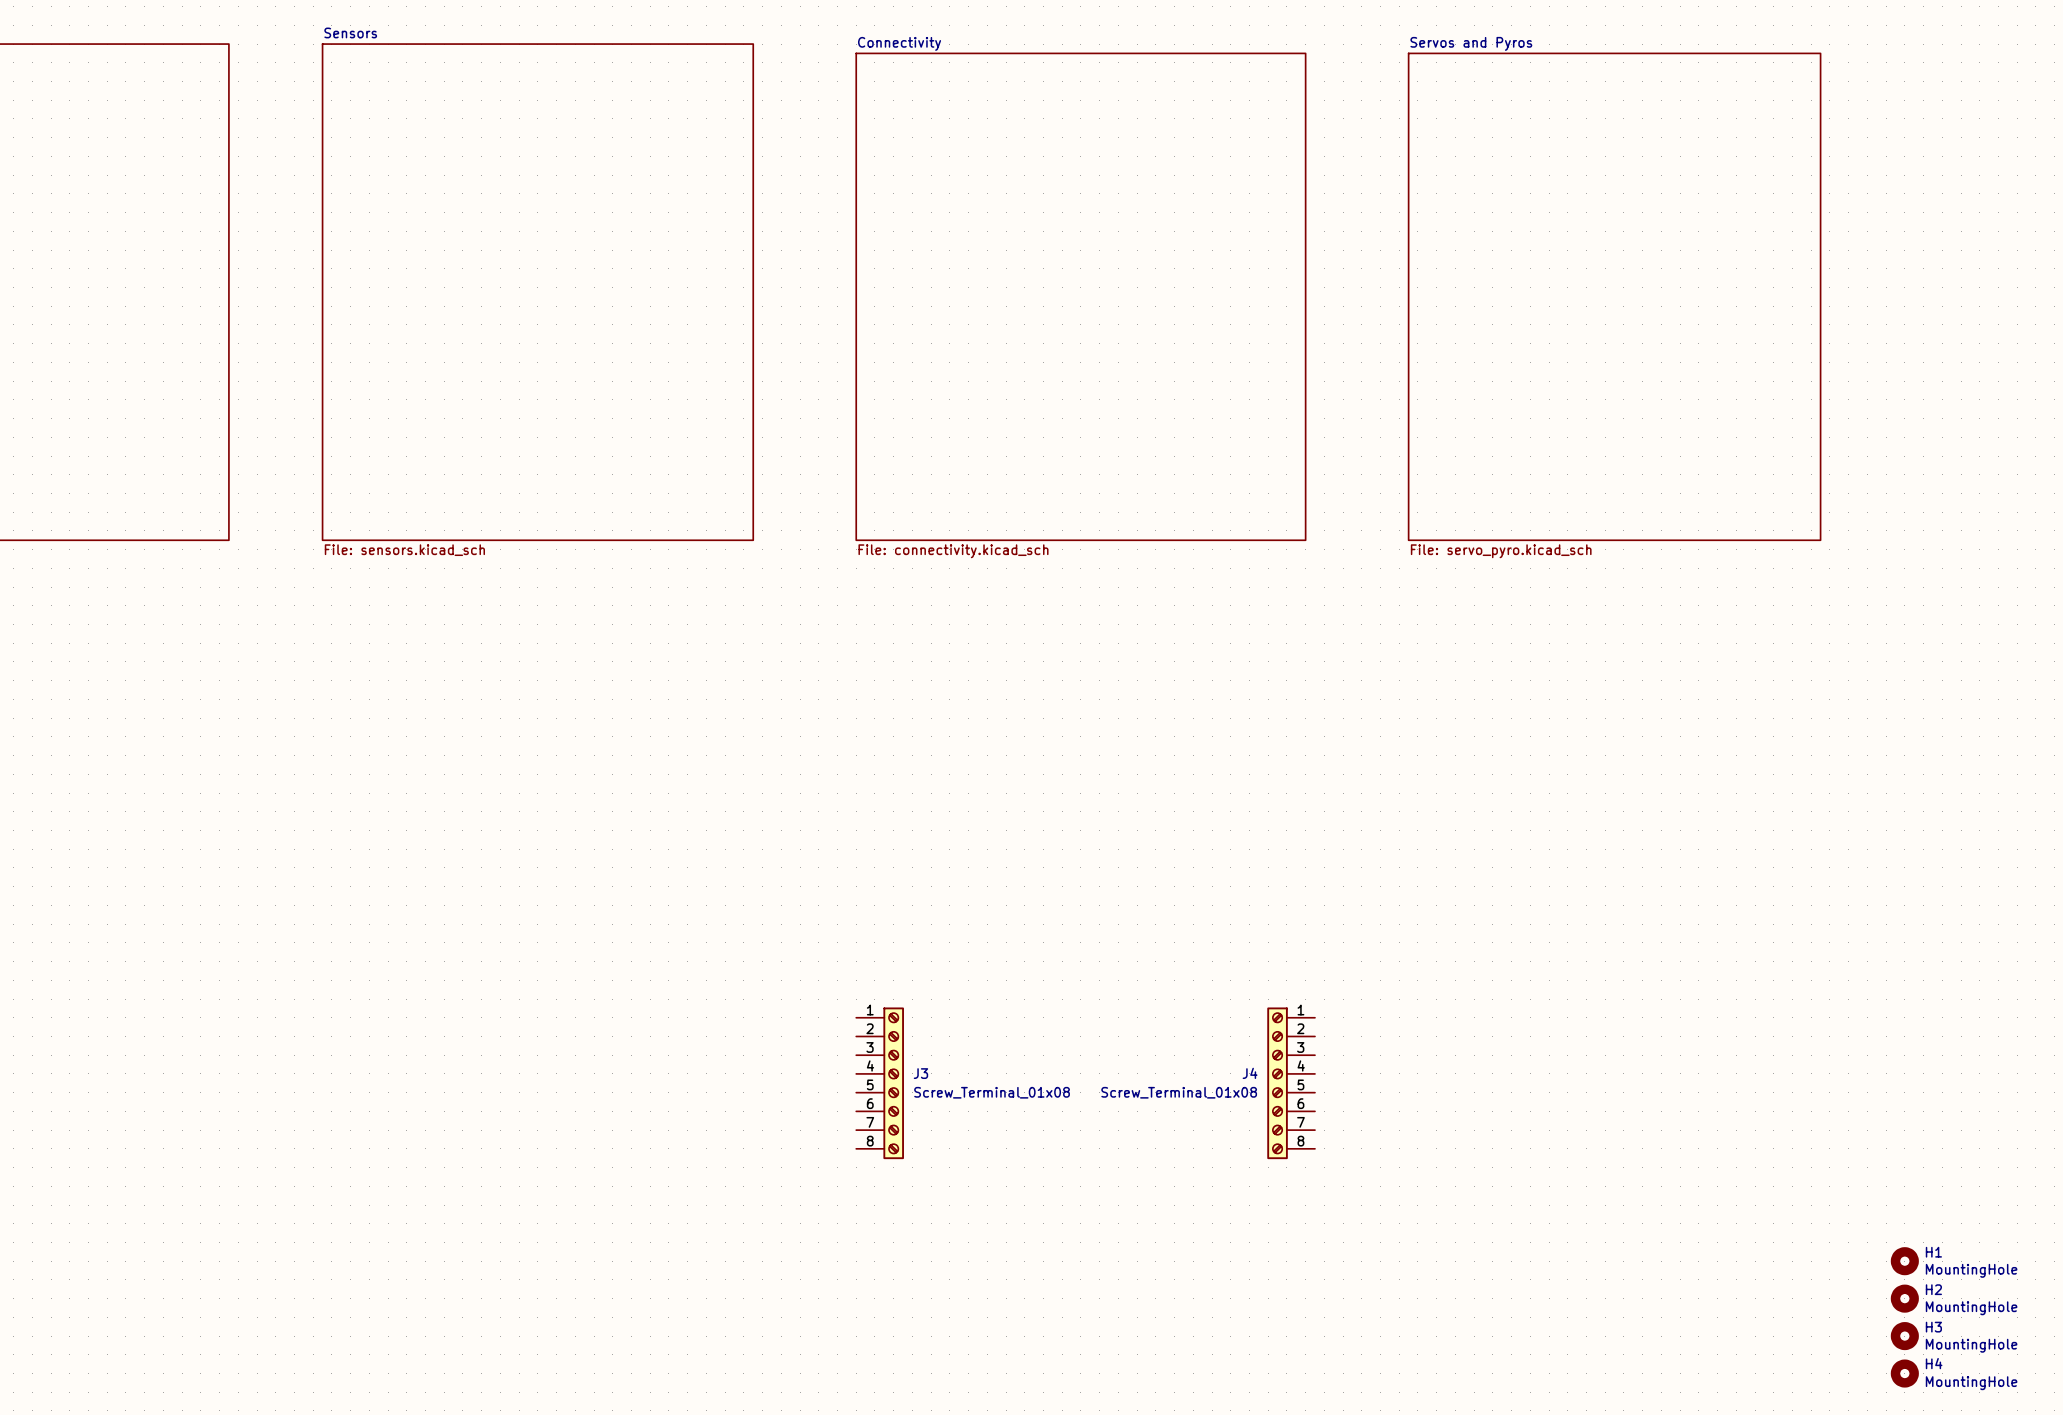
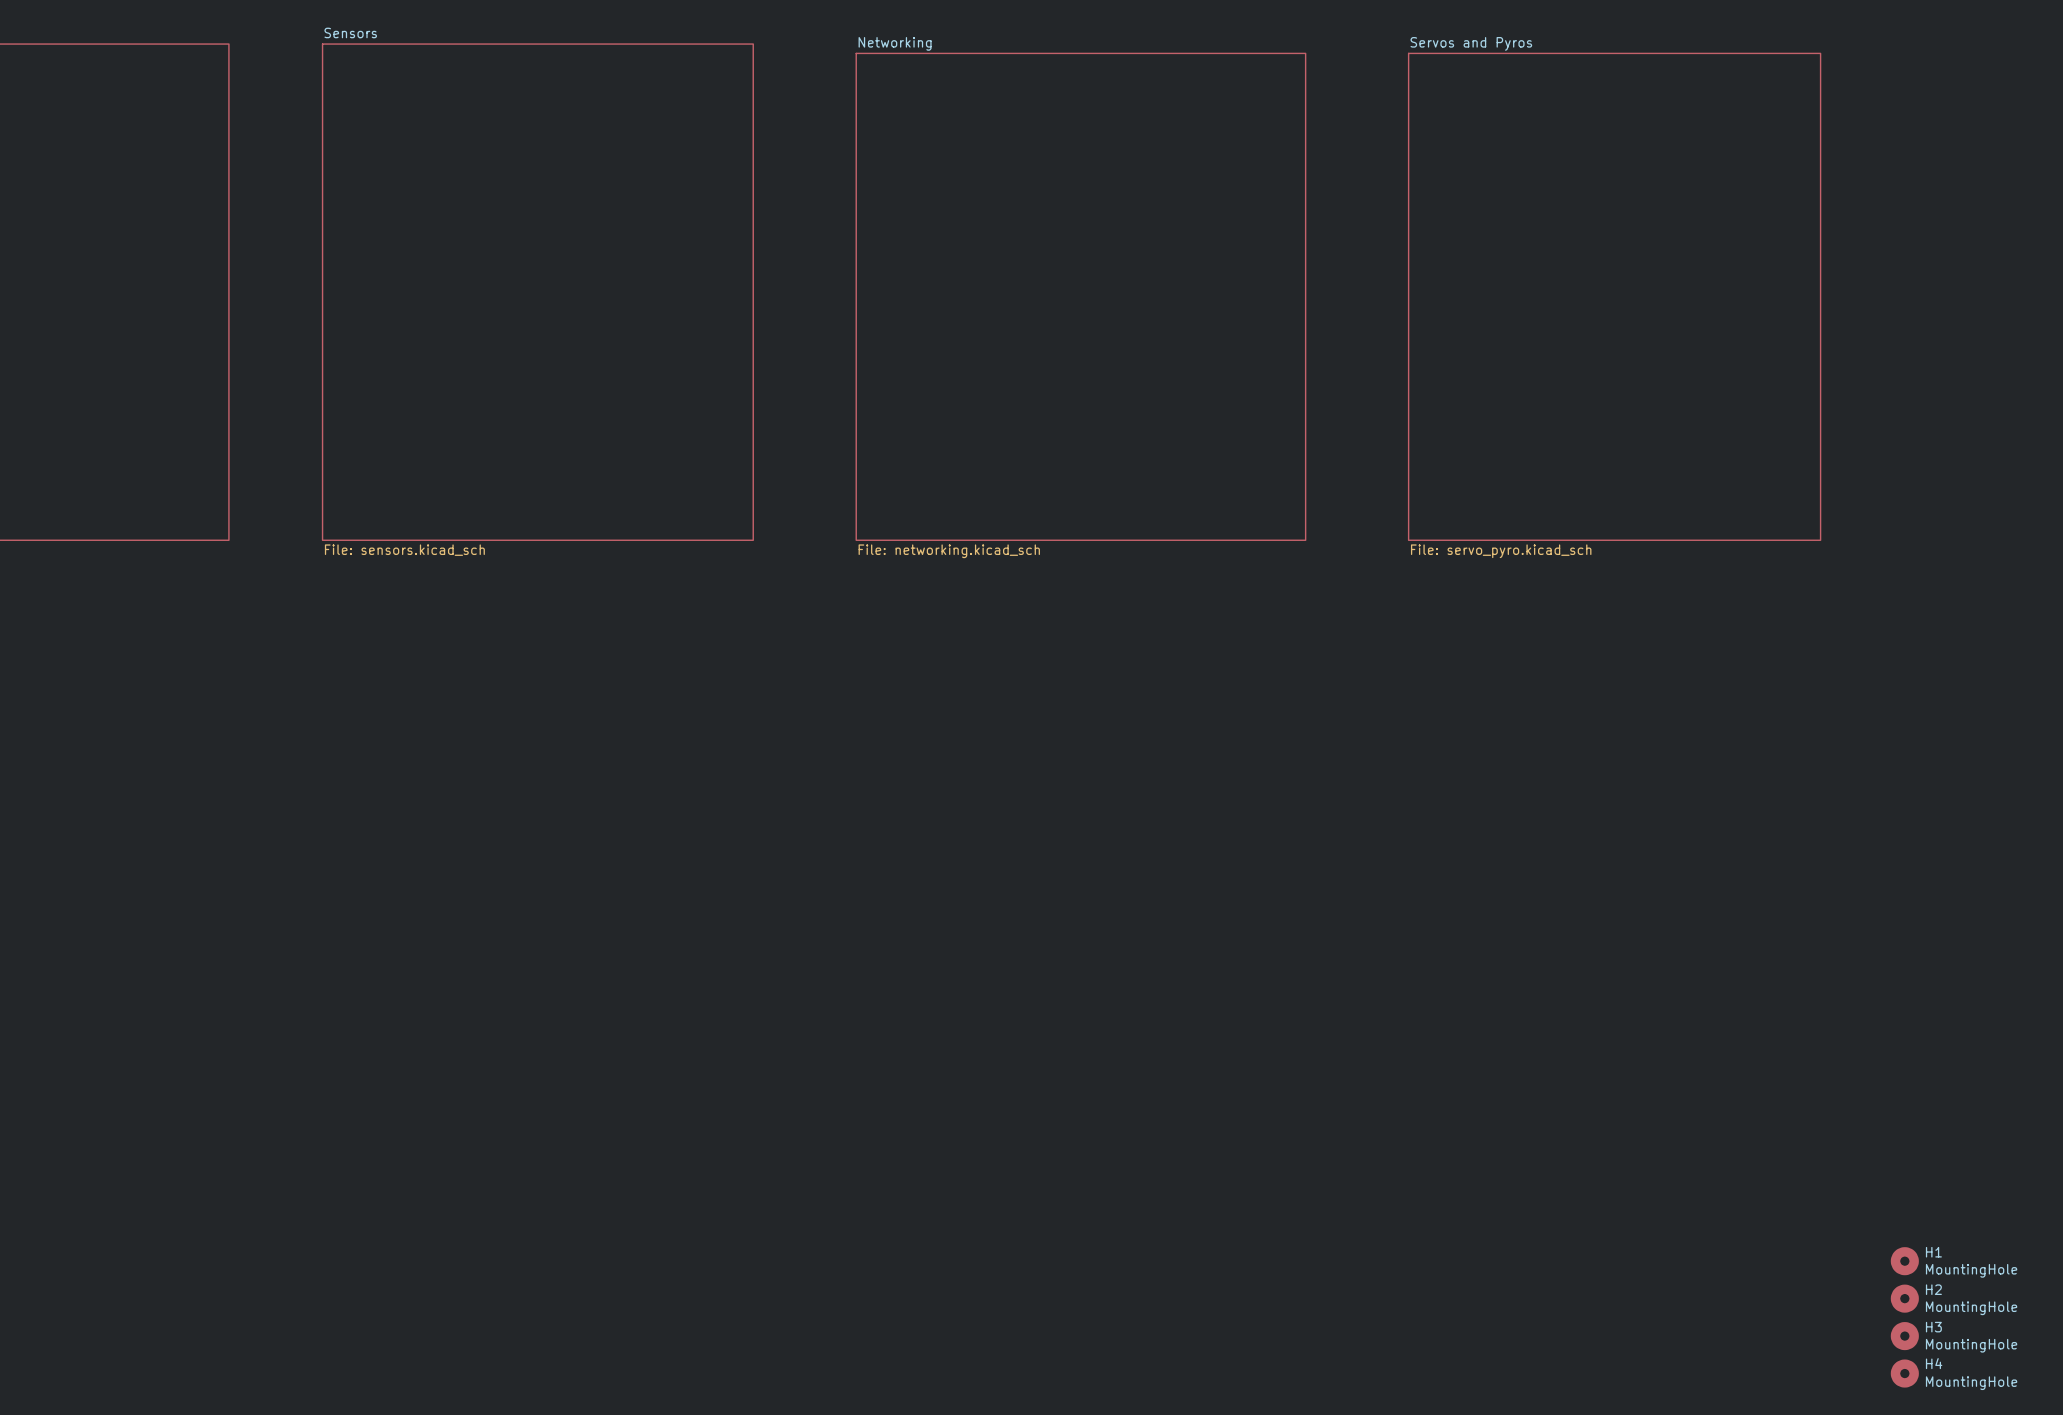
sheet Connectivity name: Connectivity (899, 43) -> Networking (895, 43)
sheet Connectivity value: File: connectivity.kicad_sch (953, 551) -> File: networking.kicad_sch (949, 551)
J3: Screw_Terminal_01x08 (880, 1083) -> none
J4: Screw_Terminal_01x08 (1291, 1083) -> none

